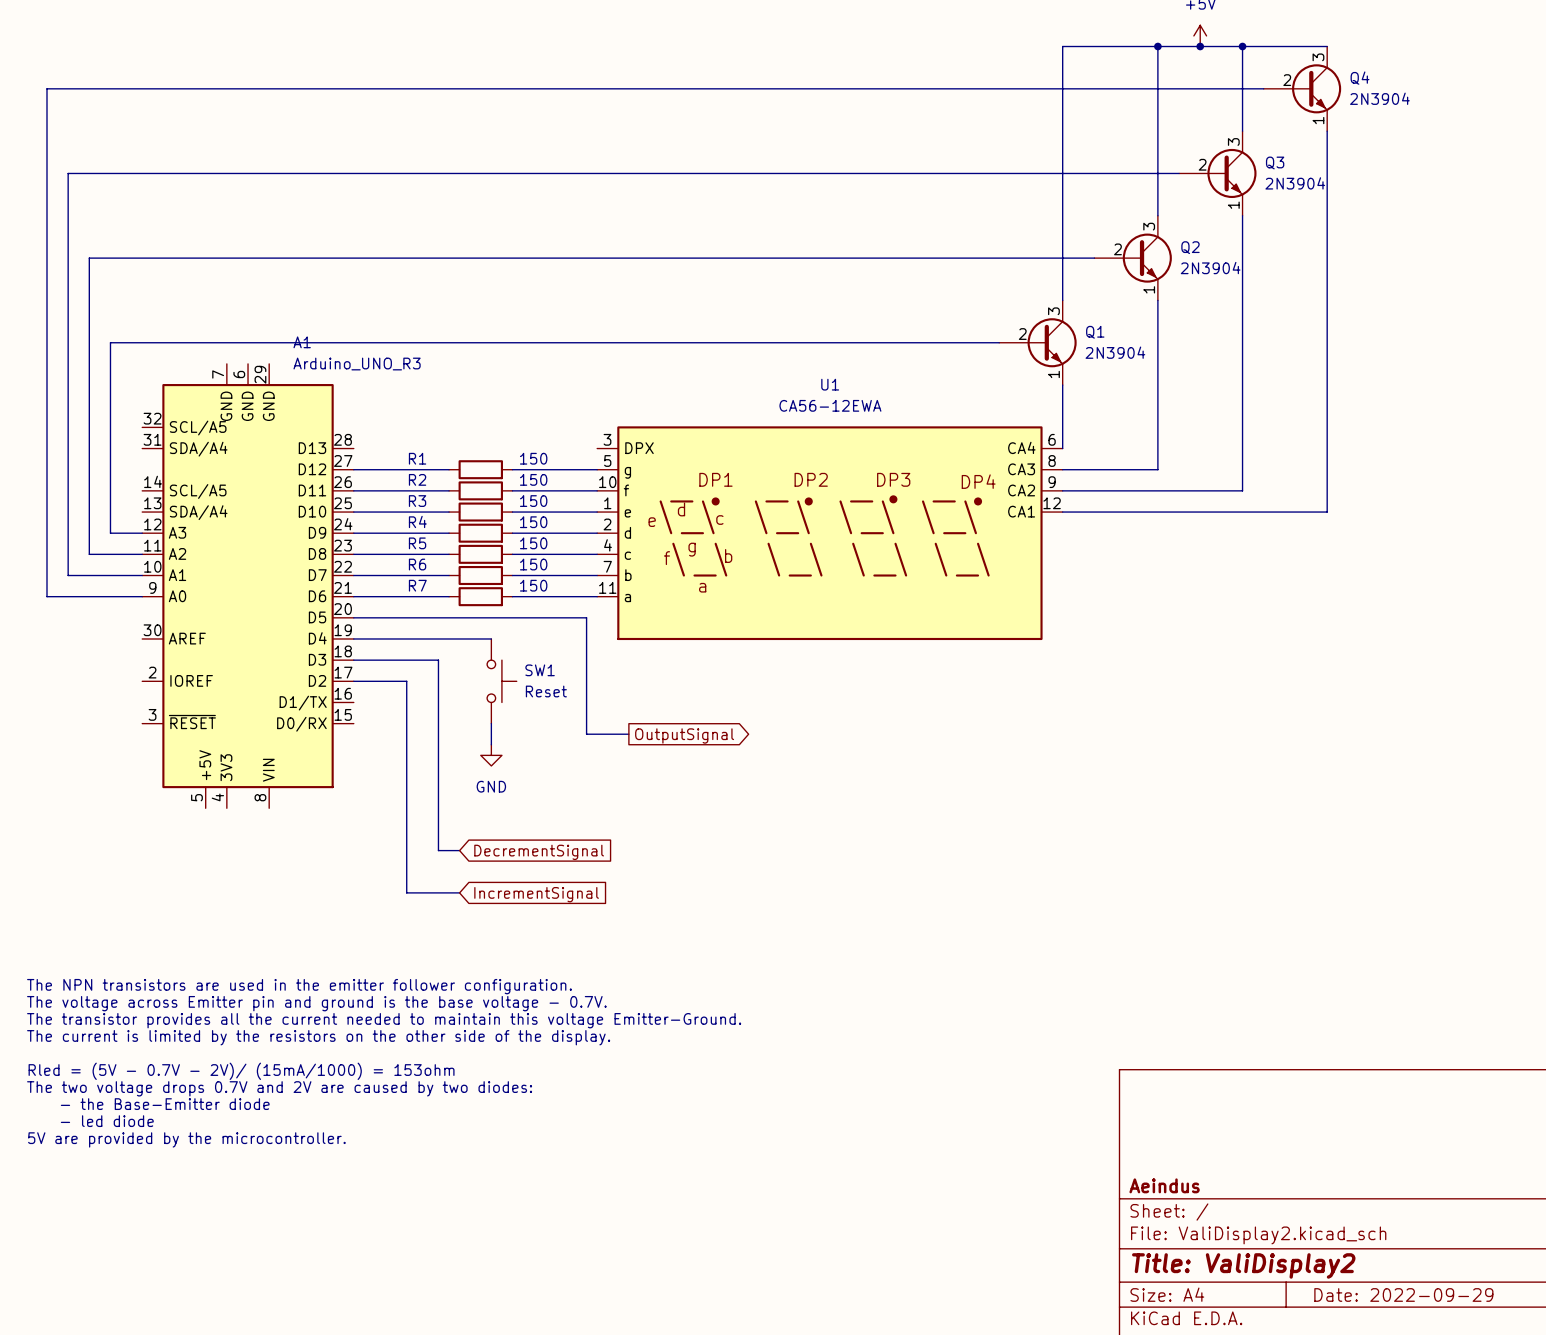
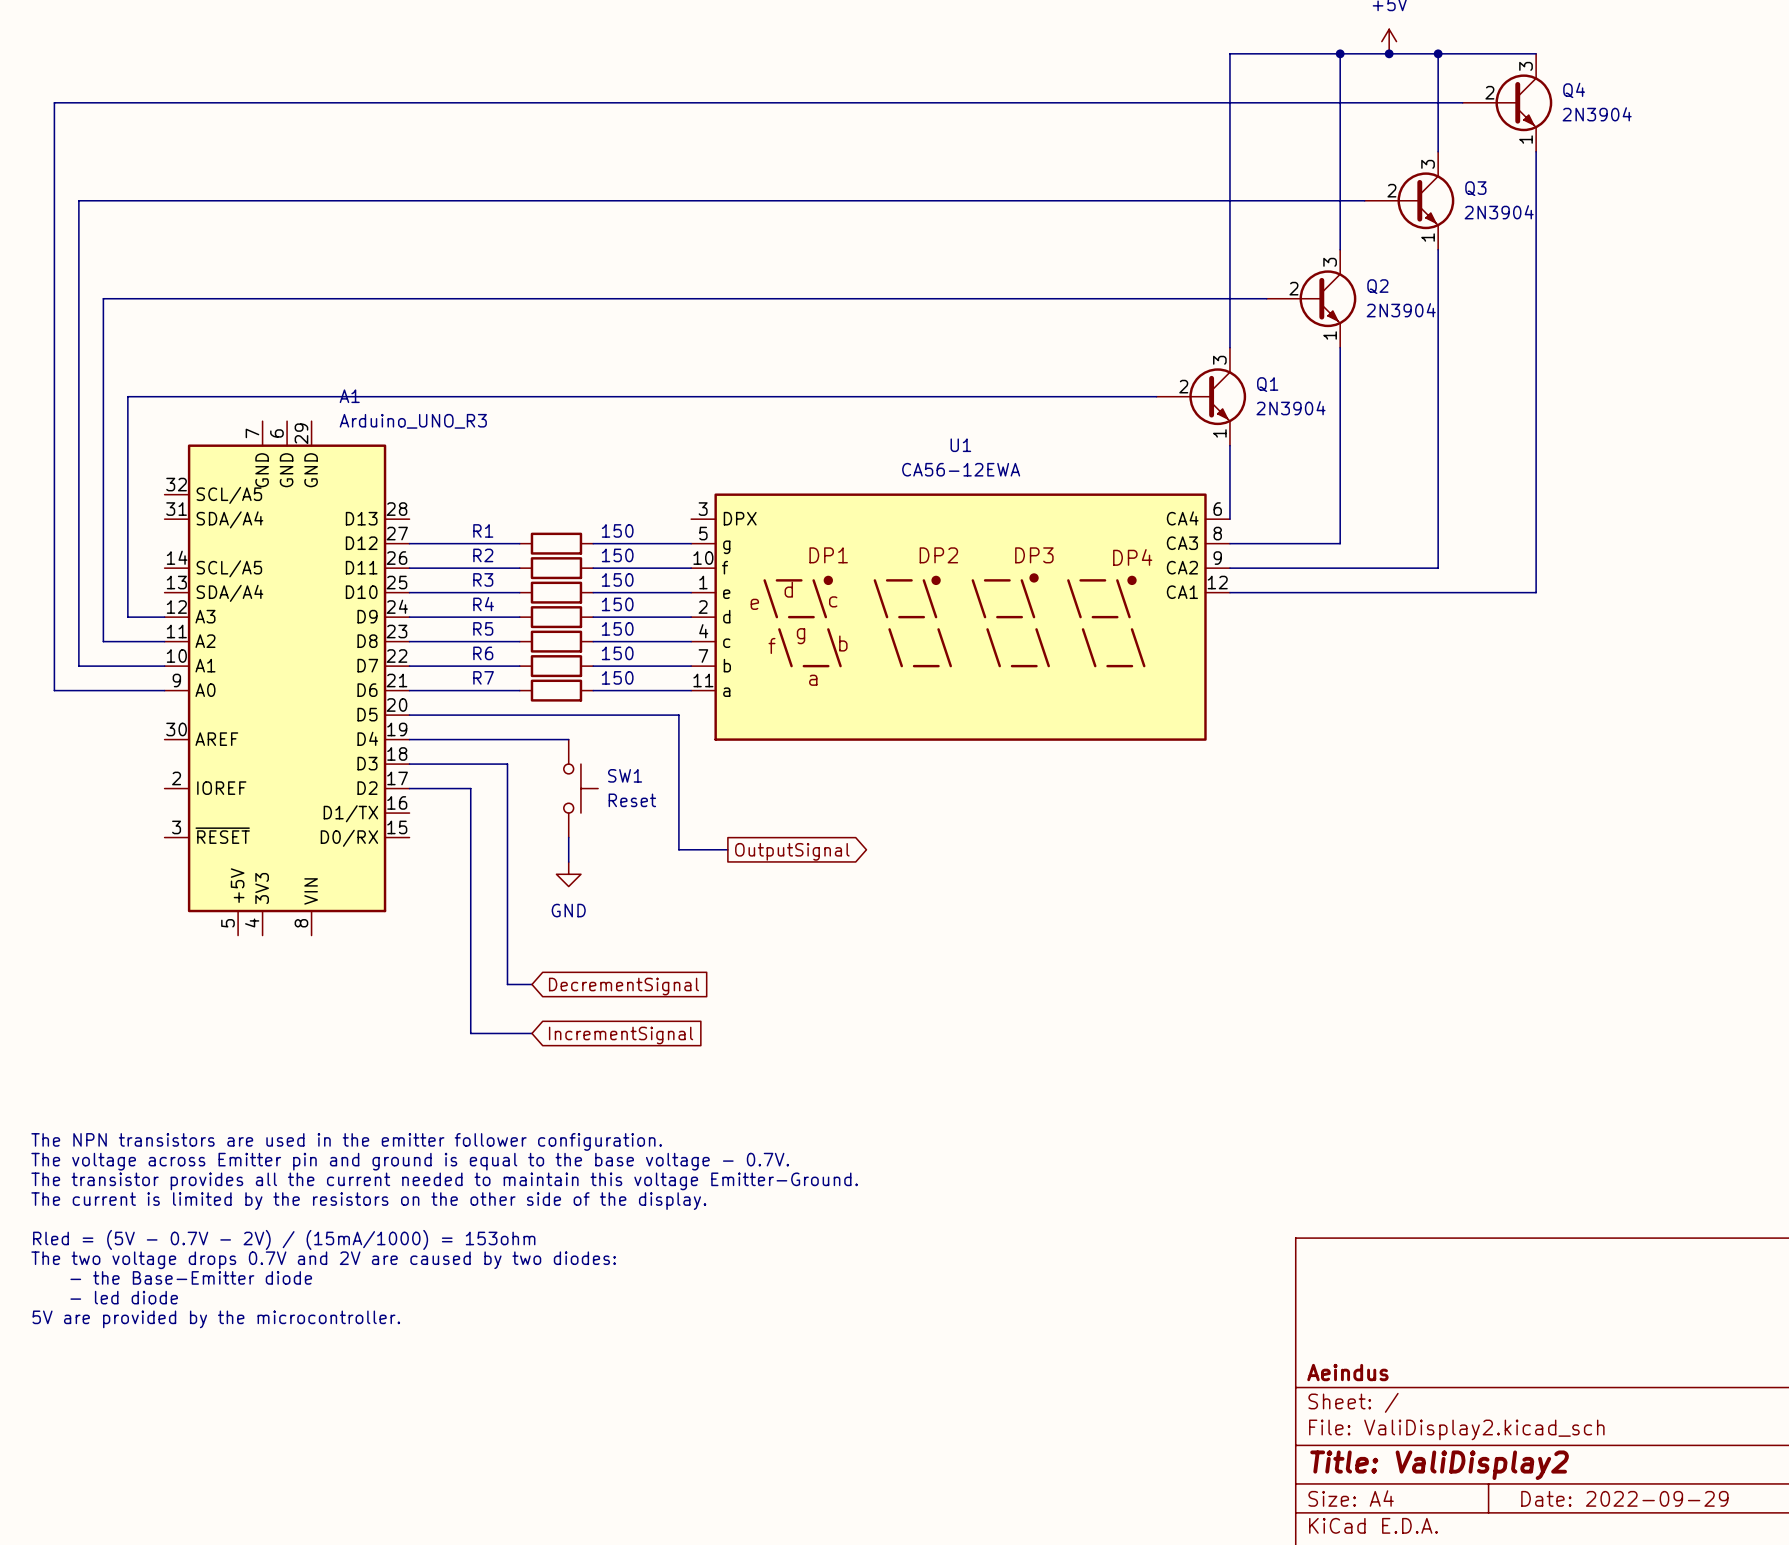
text: The voltage across Emitter pin and ground is the base voltage - 0.7V. (316, 1003) -> The voltage across Emitter pin and ground is equal to the base voltage - 0.7V. (410, 1161)
text: Rled = (5V - 0.7V - 2V)/ (15mA/1000) = 153ohm (241, 1071) -> Rled = (5V - 0.7V - 2V) / (15mA/1000) = 153ohm (284, 1239)

